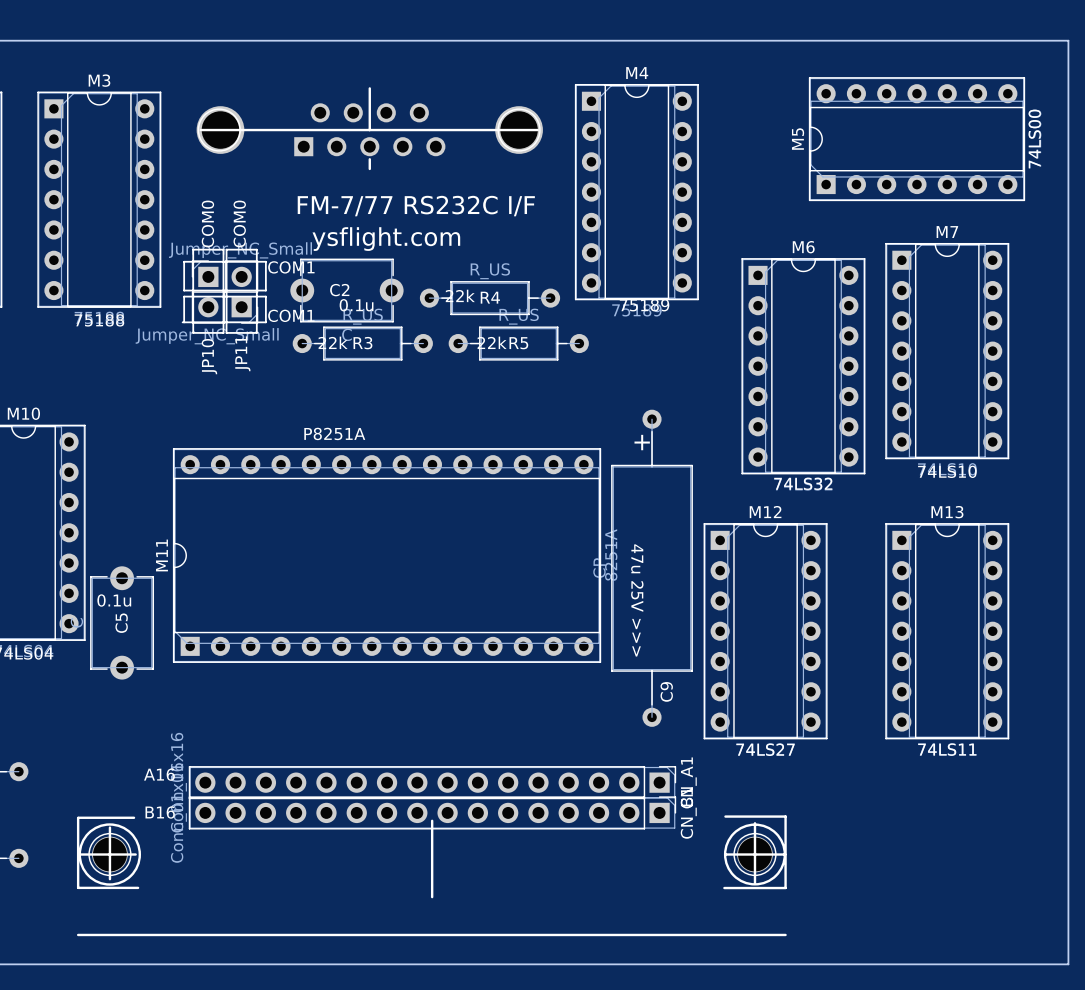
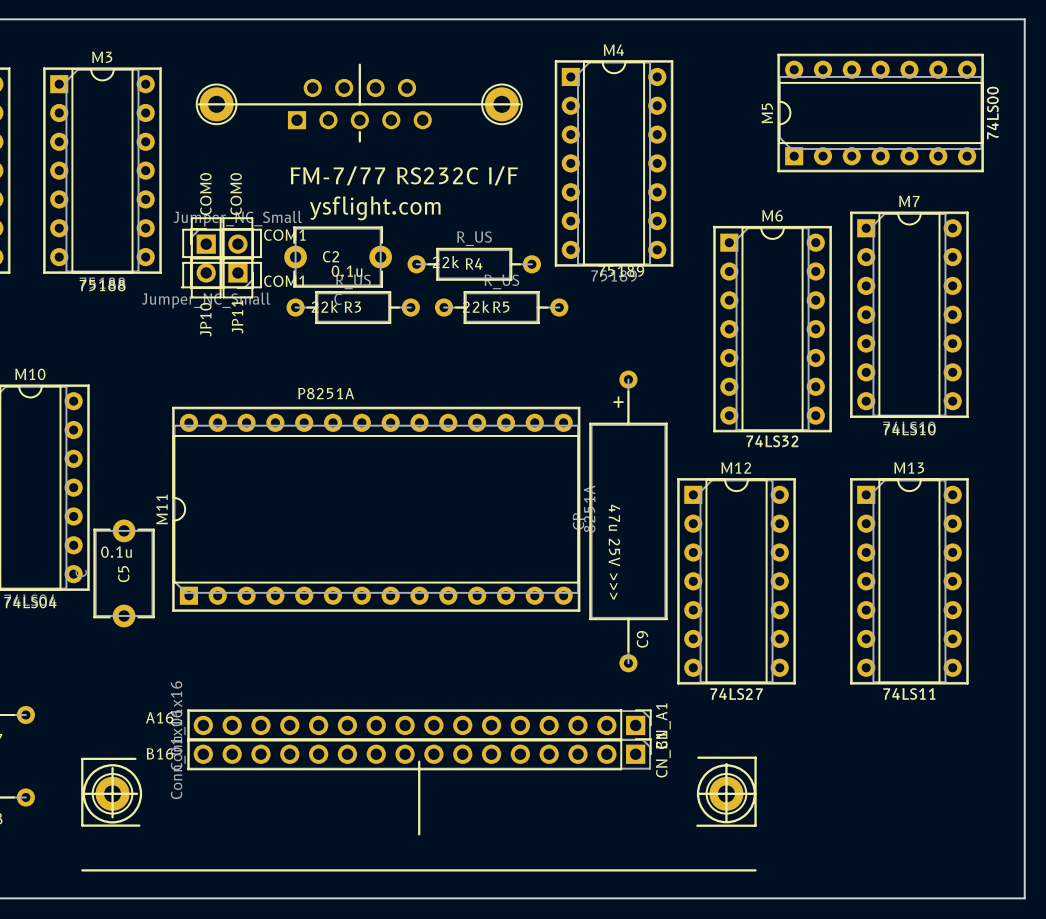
part footprint: [196, 106, 245, 154] -> [196, 83, 238, 125]
part footprint: [495, 106, 543, 154] -> [481, 83, 523, 125]
part footprint: [88, 832, 132, 877] -> [92, 773, 134, 815]
part footprint: [733, 832, 777, 877] -> [705, 773, 747, 815]

